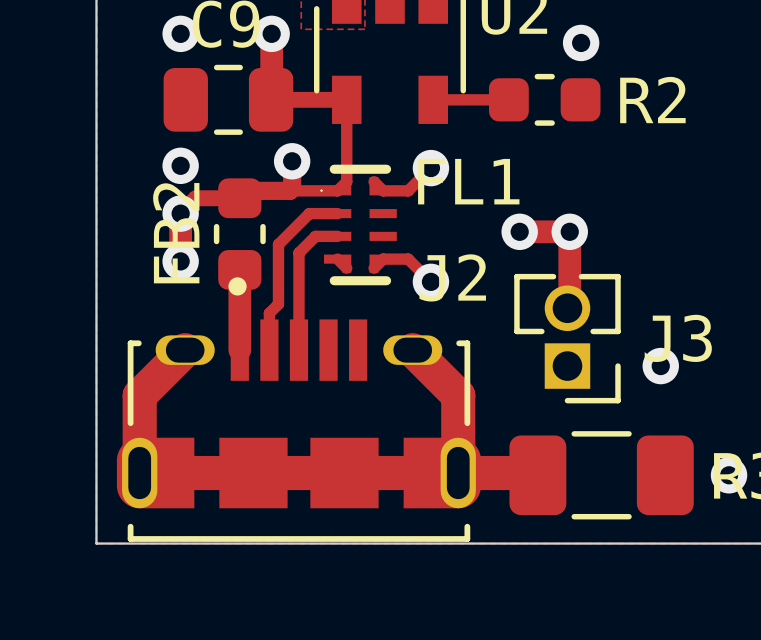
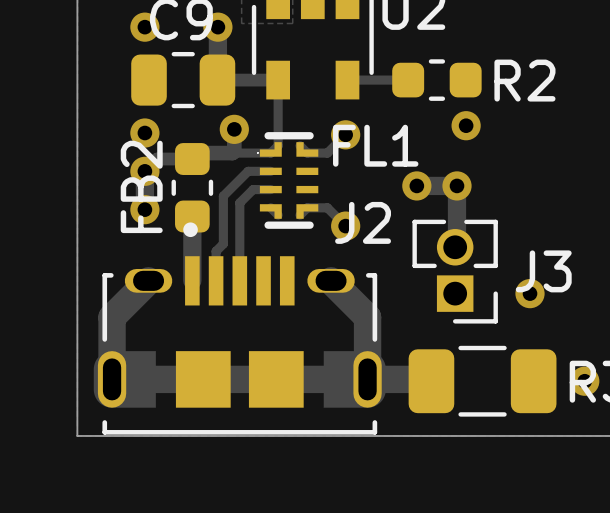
via position: (581, 42) -> (466, 125)

